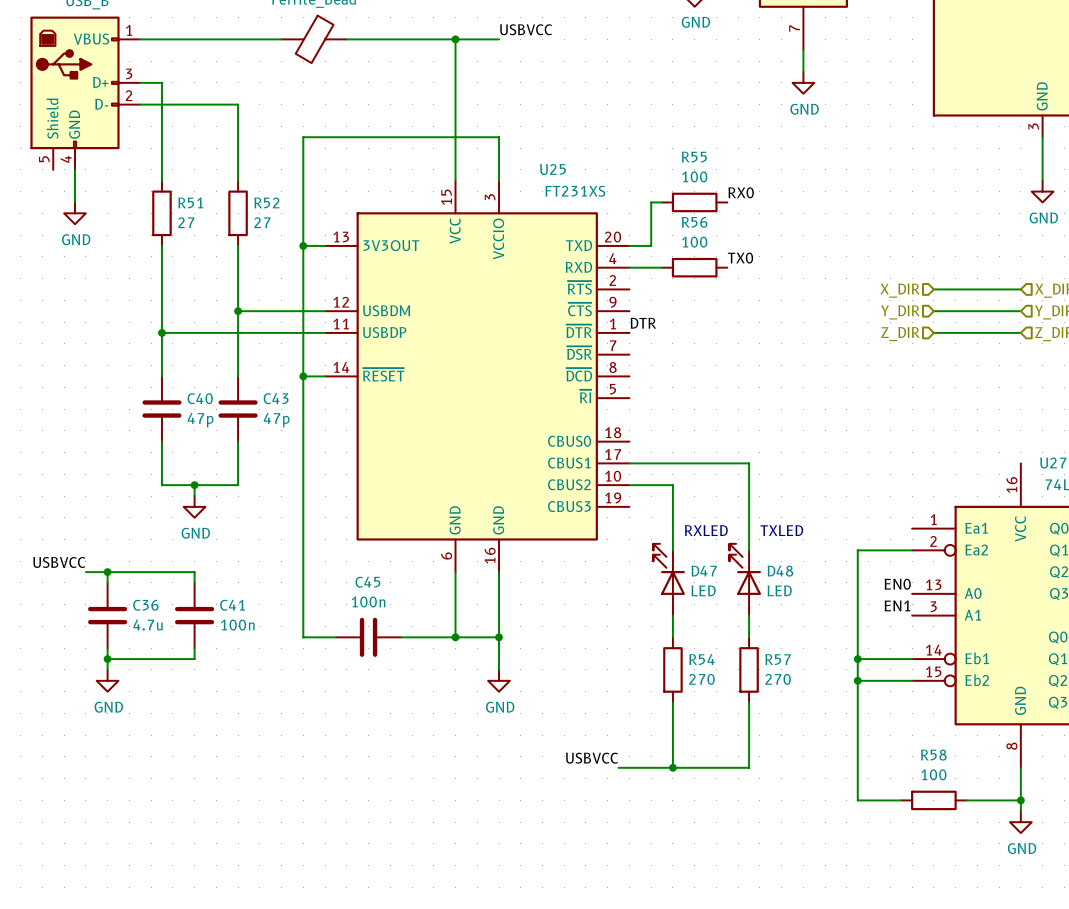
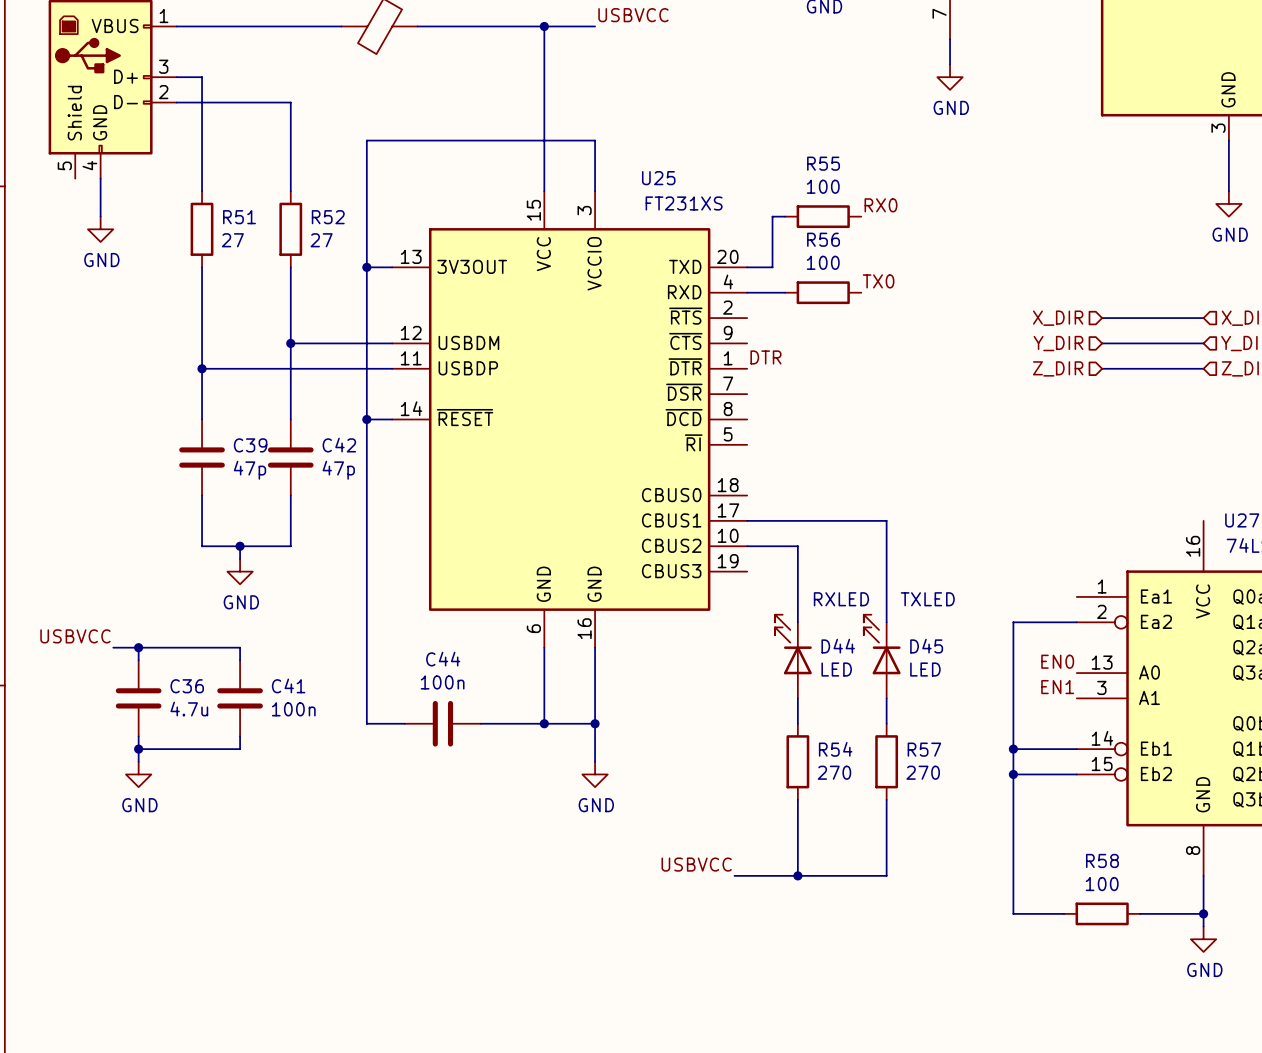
C40 name: C40 (200, 398) -> C39 (250, 445)
C43 name: C43 (276, 398) -> C42 (339, 445)
D47 name: D47 (704, 571) -> D44 (838, 646)
D48 name: D48 (780, 571) -> D45 (926, 646)
C45 name: C45 (367, 582) -> C44 (443, 659)

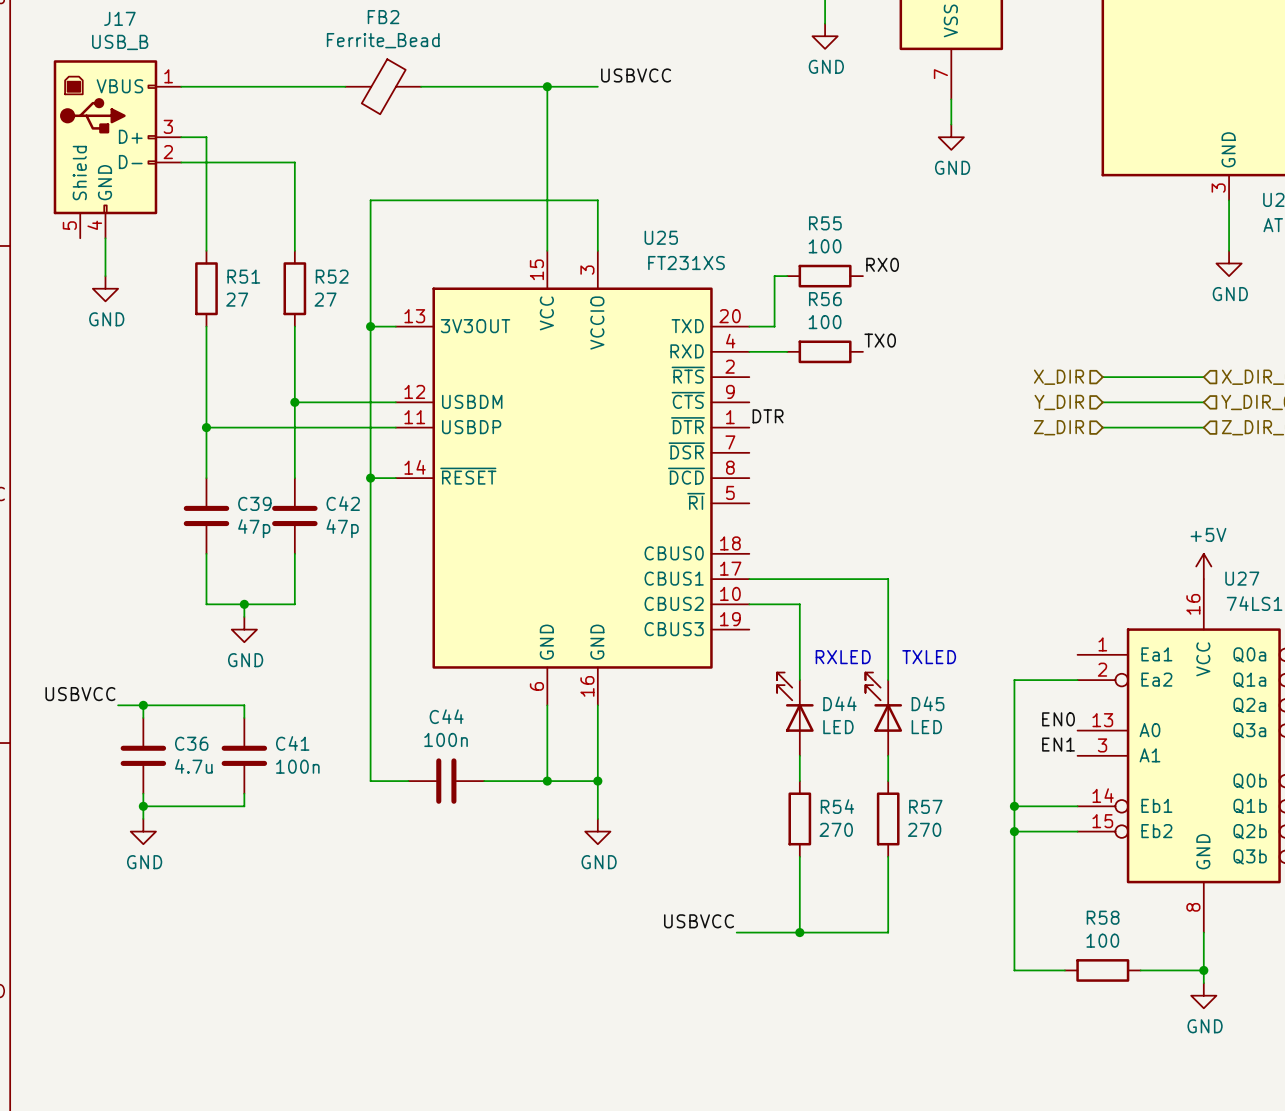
power symbol: none -> +5V (1203, 566)

